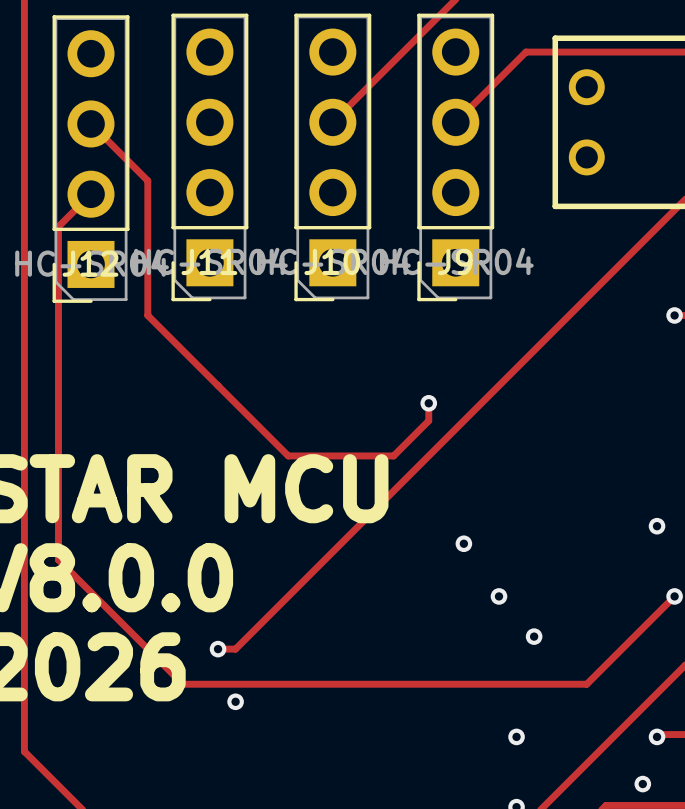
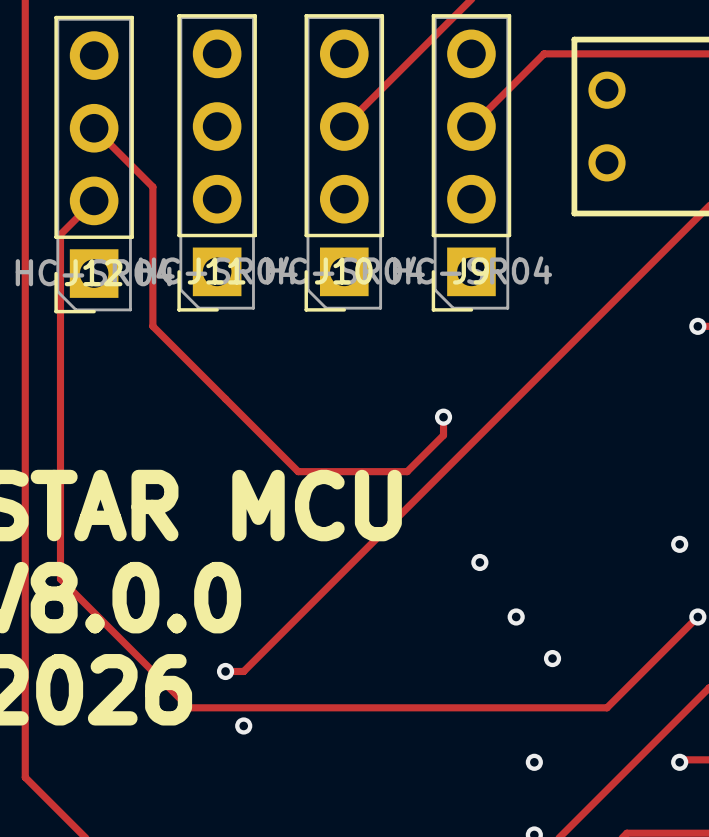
via: (642, 784) -> none

